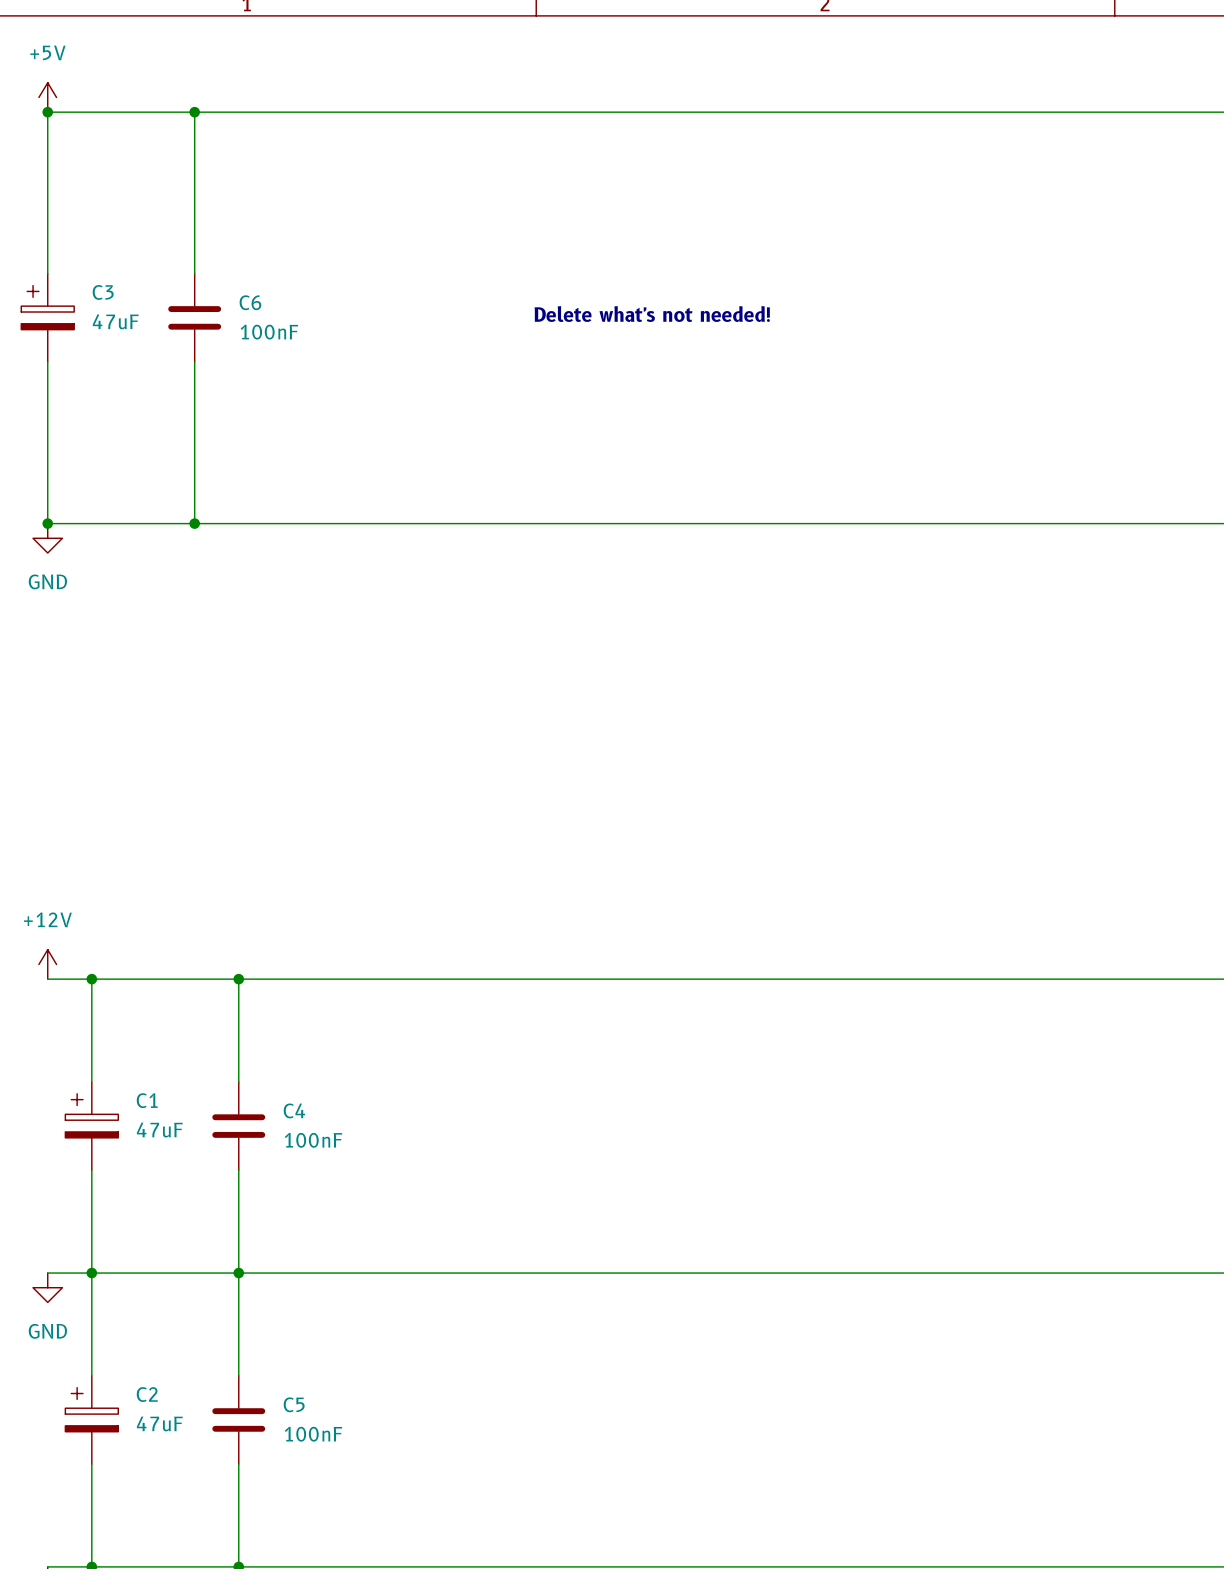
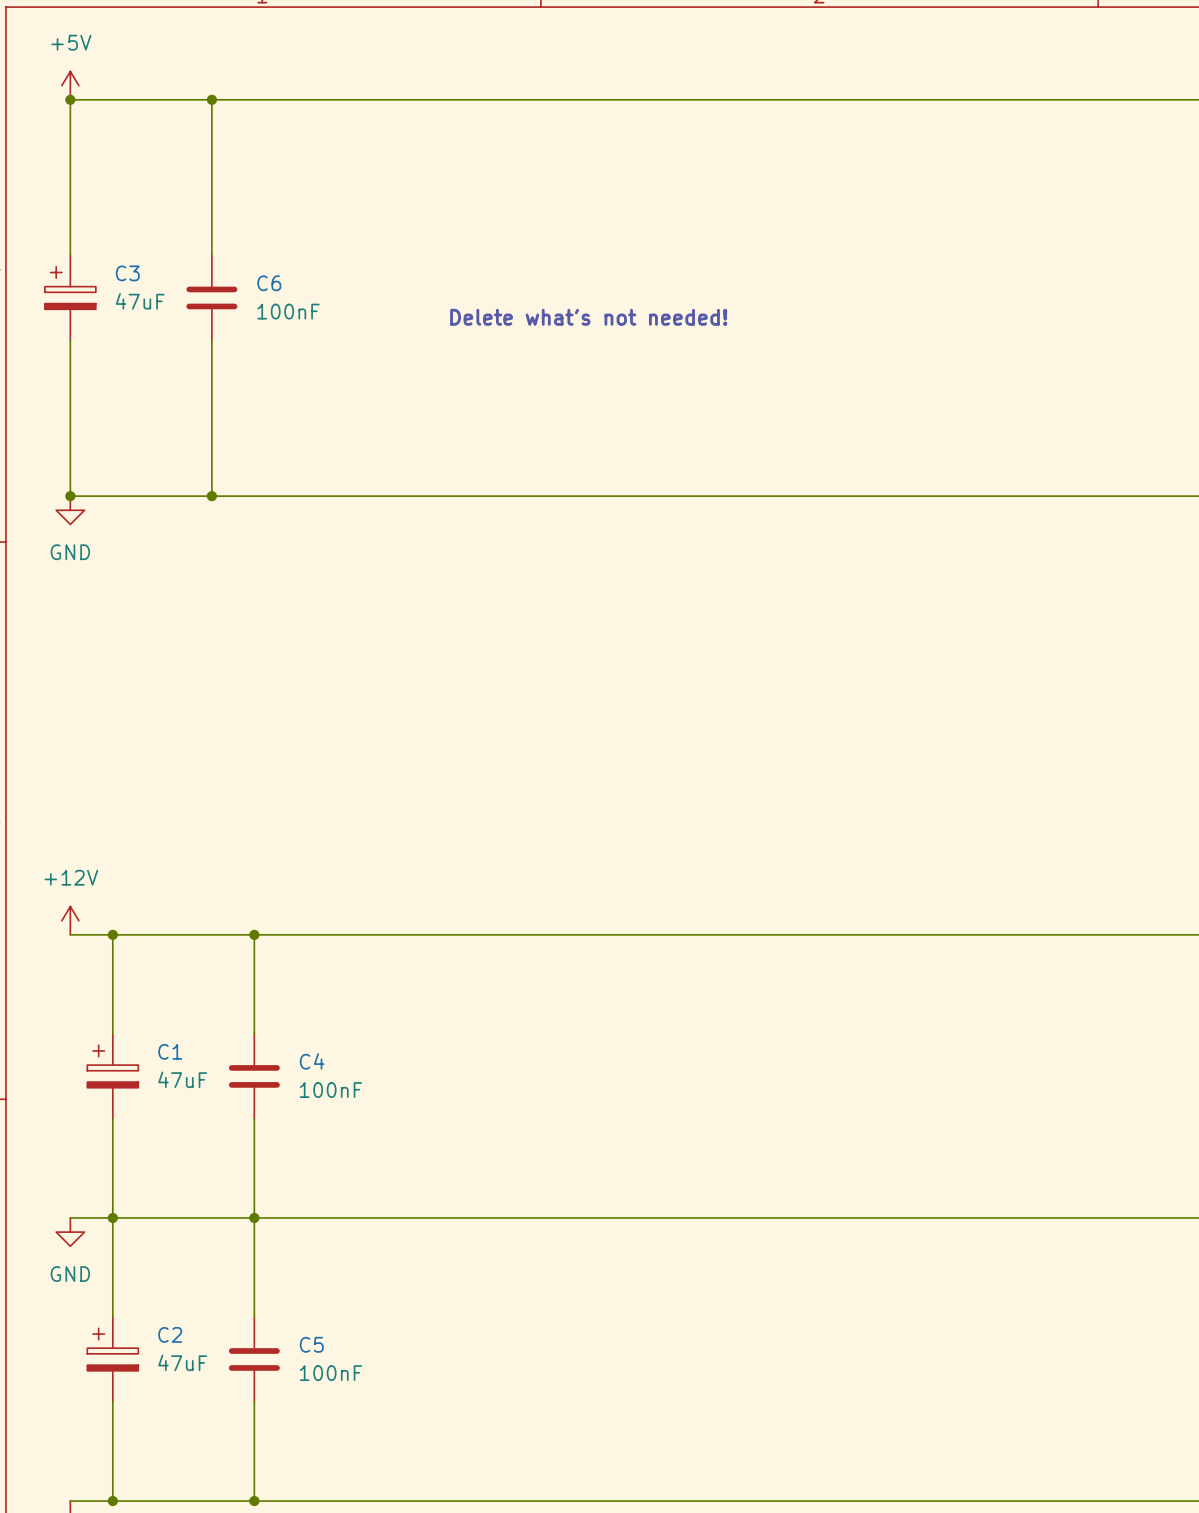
text position: Delete what's not needed! (652, 314) -> Delete what's not needed! (588, 317)

